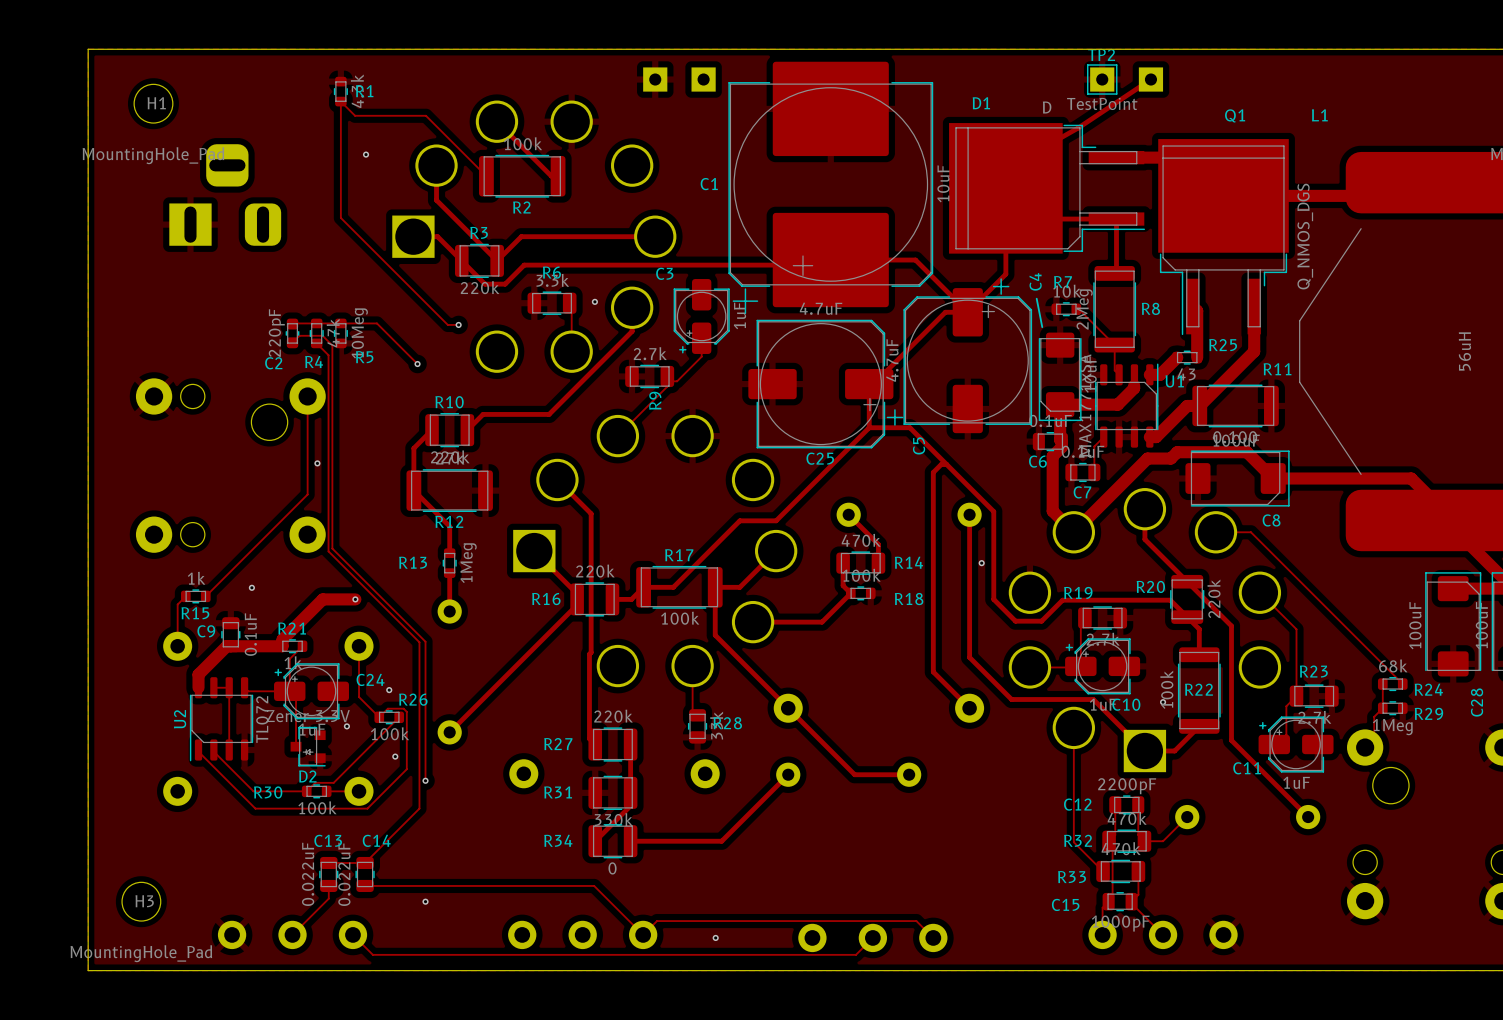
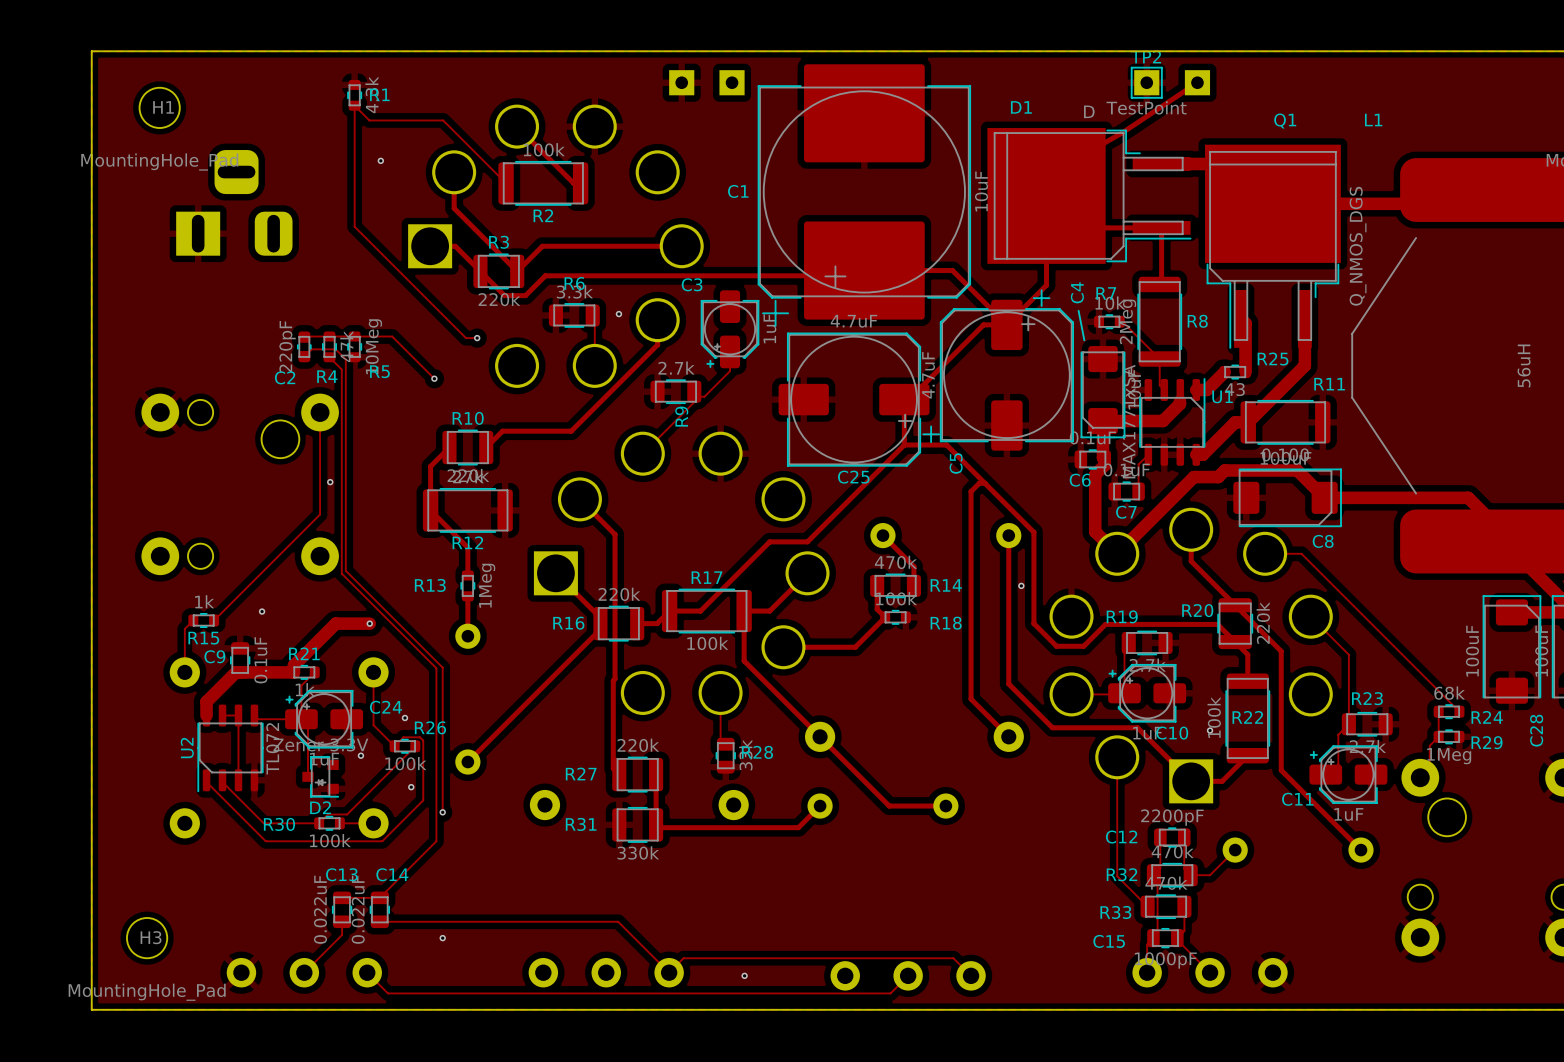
track: (630, 792) (630, 805) (595, 841) -> none
track: (767, 795) (721, 841) (630, 841) -> (798, 827) (658, 827) (656, 824)
R34: 0 (612, 841) -> none

